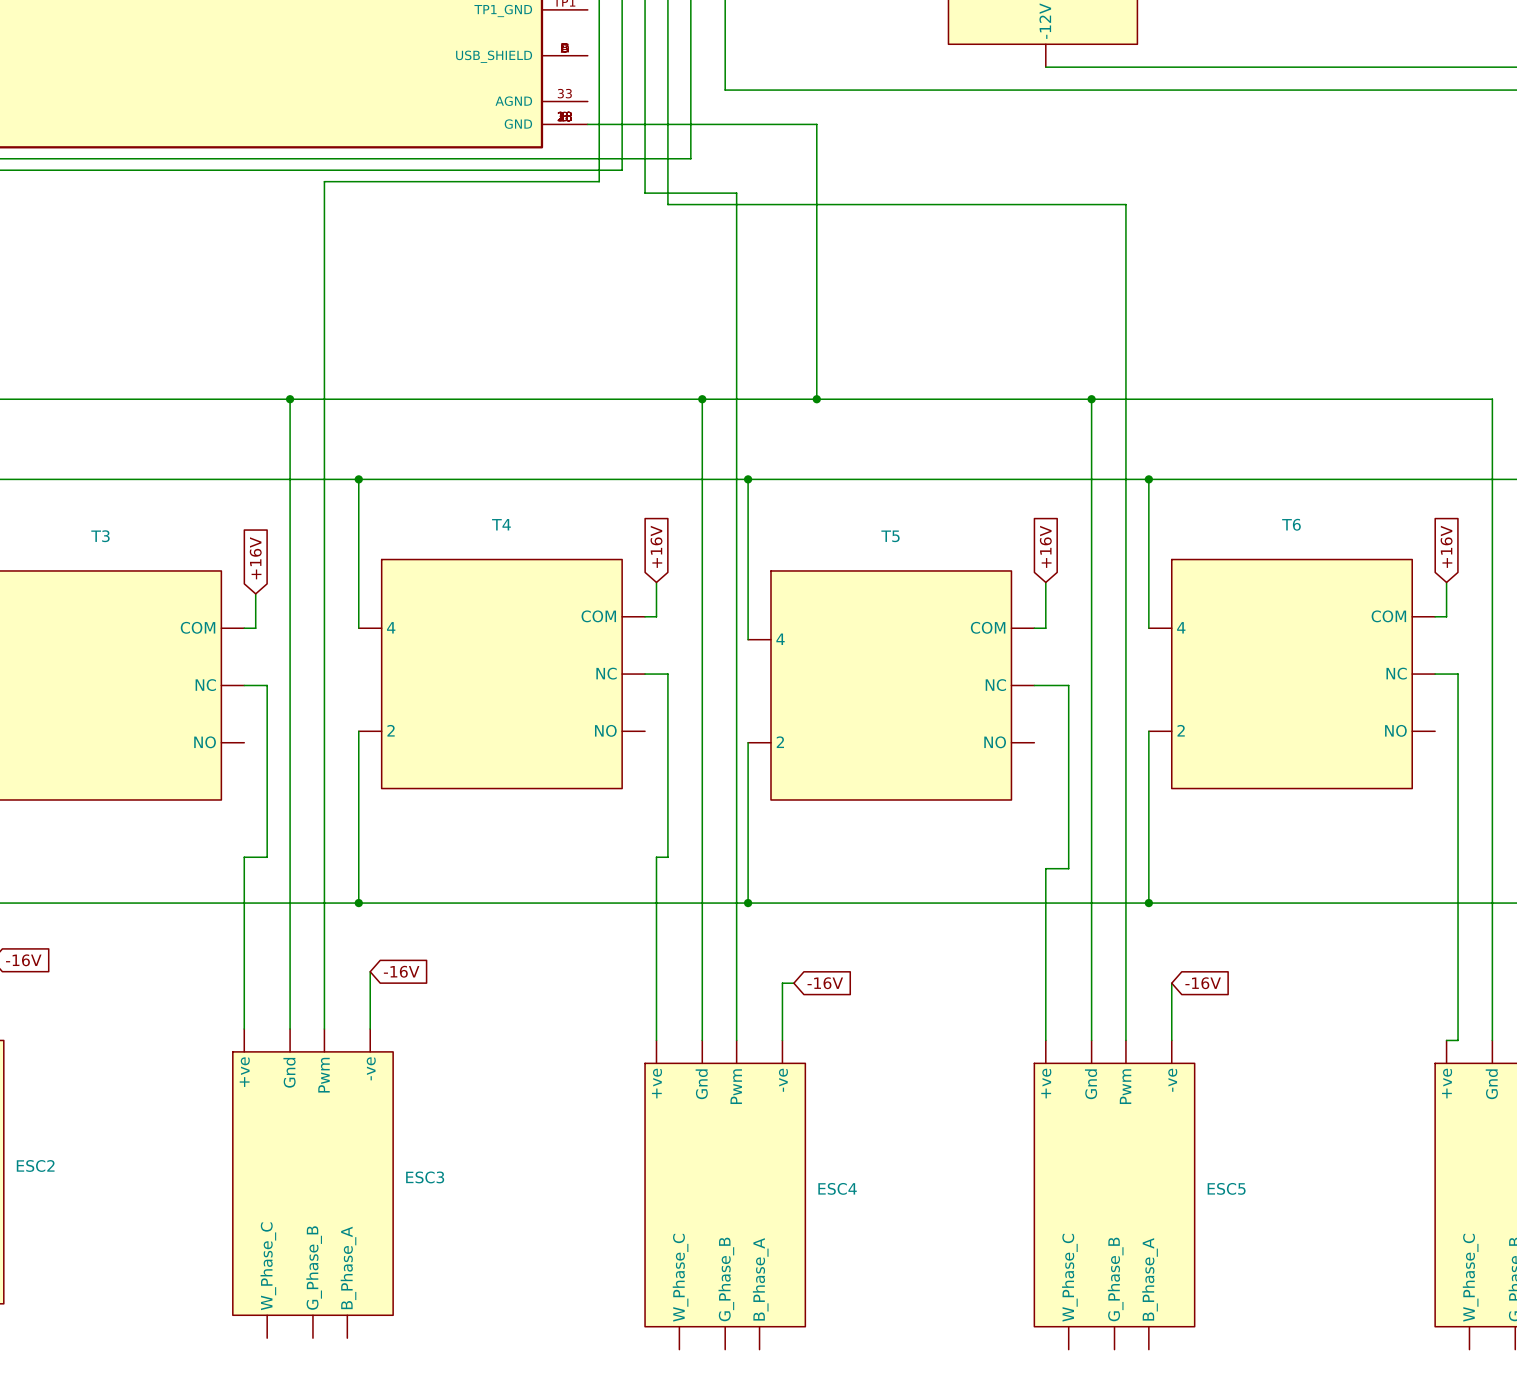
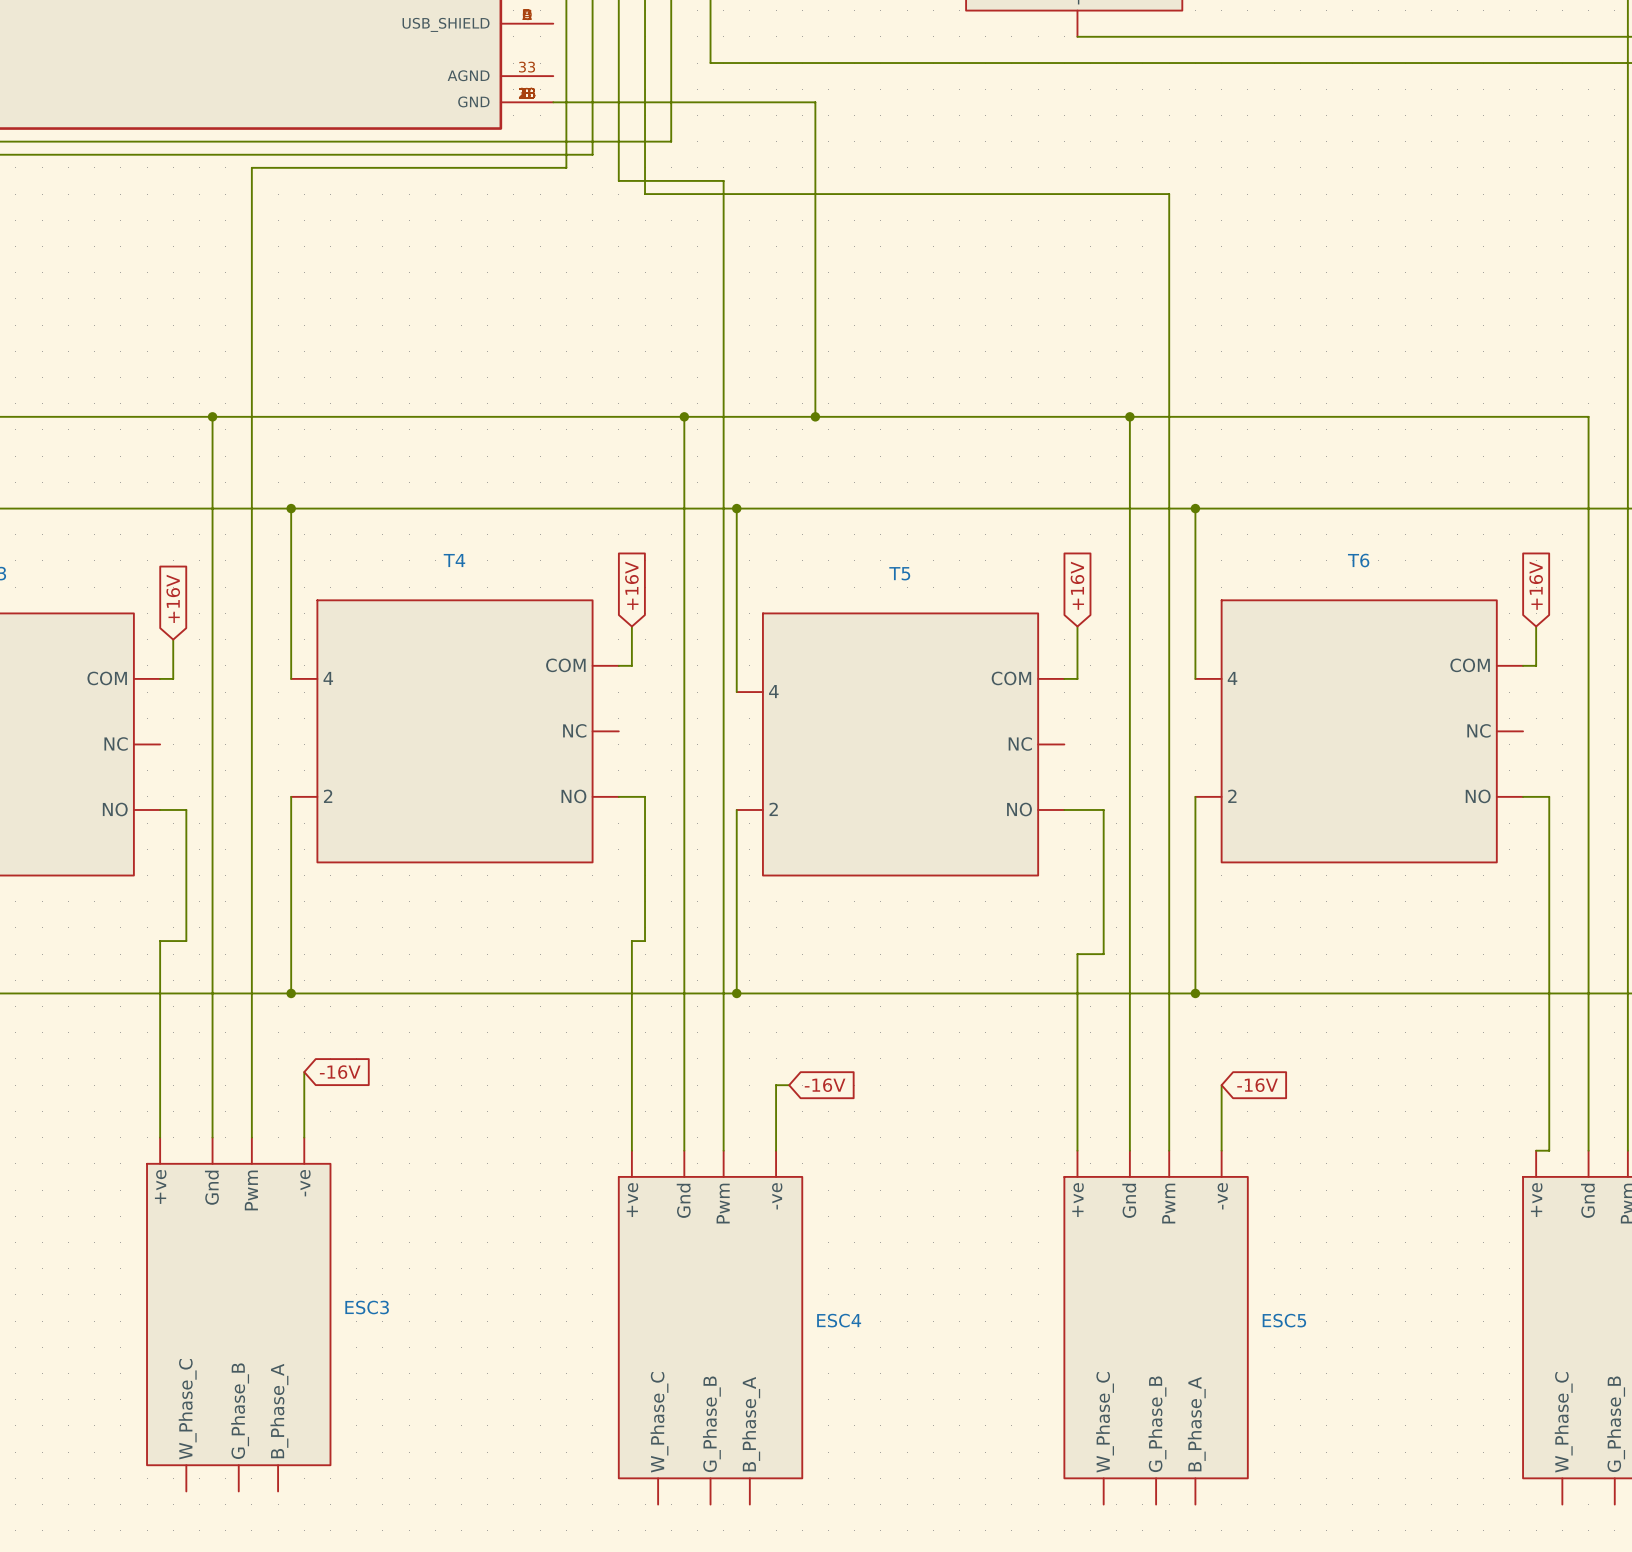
wire: (645, 674) (667, 674) (667, 731) -> (618, 796) (645, 796)
wire: (1435, 674) (1458, 674) (1458, 731) -> (1523, 796) (1549, 796)
wire: (244, 685) (267, 685) (267, 742) -> (160, 809) (186, 809)
wire: (1034, 685) (1068, 685) (1068, 742) -> (1064, 809) (1103, 809)

